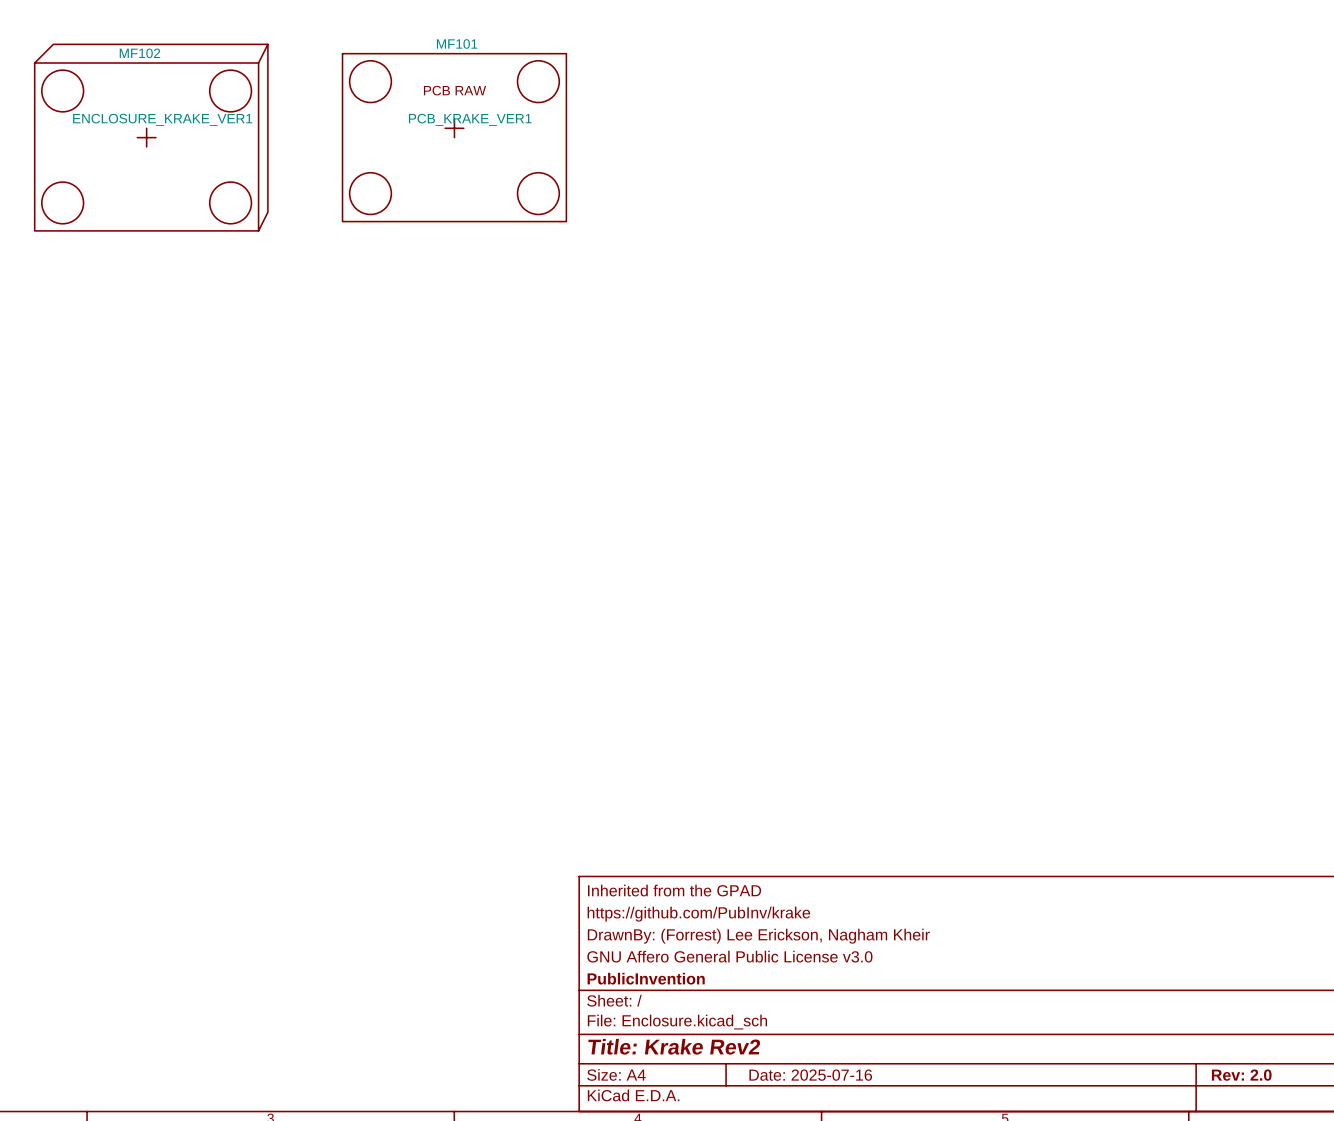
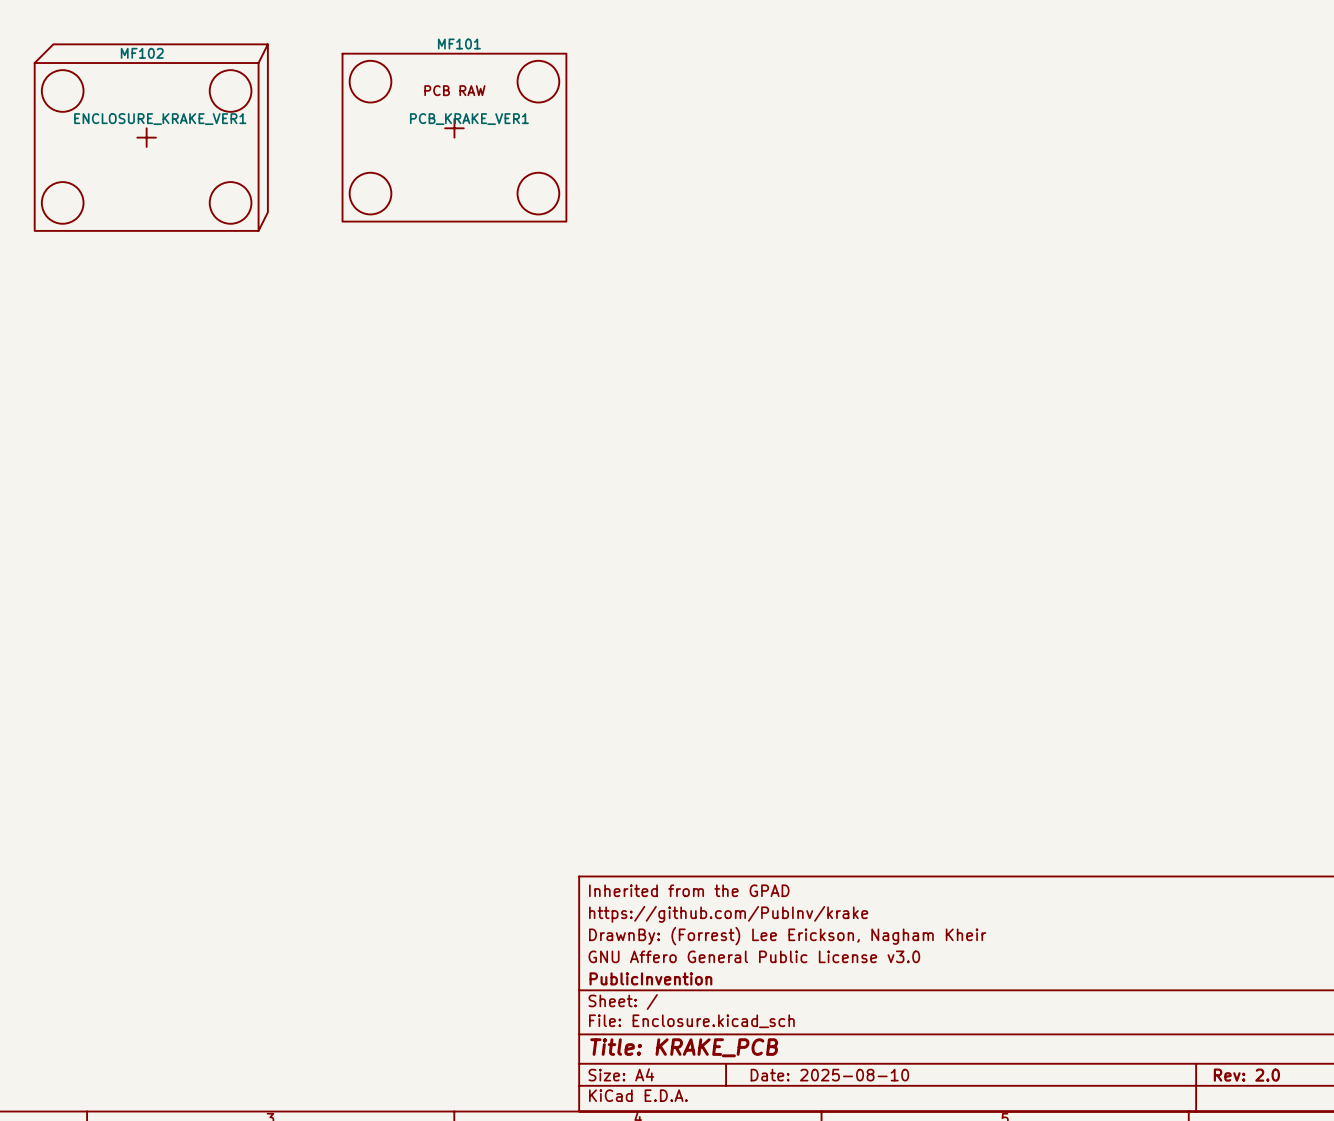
title block: Title: Krake Rev2 (674, 1046) -> Title: KRAKE_PCB (684, 1047)
title block: Date: 2025-07-16 (810, 1075) -> Date: 2025-08-10 (829, 1075)

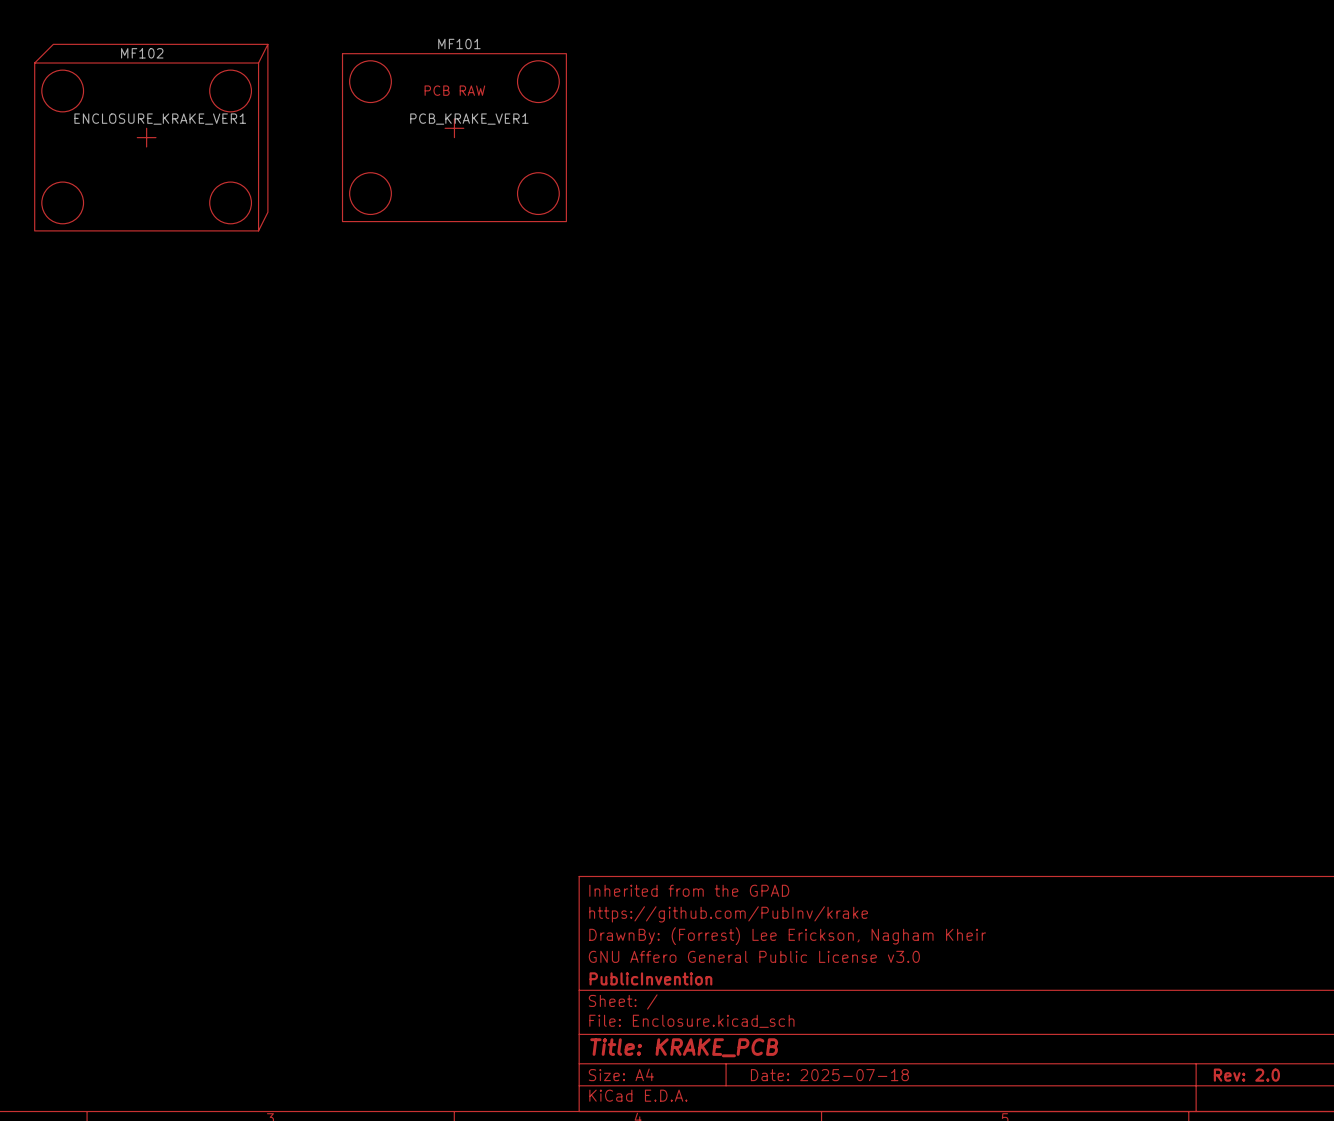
title block: Date: 2025-08-10 (829, 1075) -> Date: 2025-07-18 (829, 1075)

